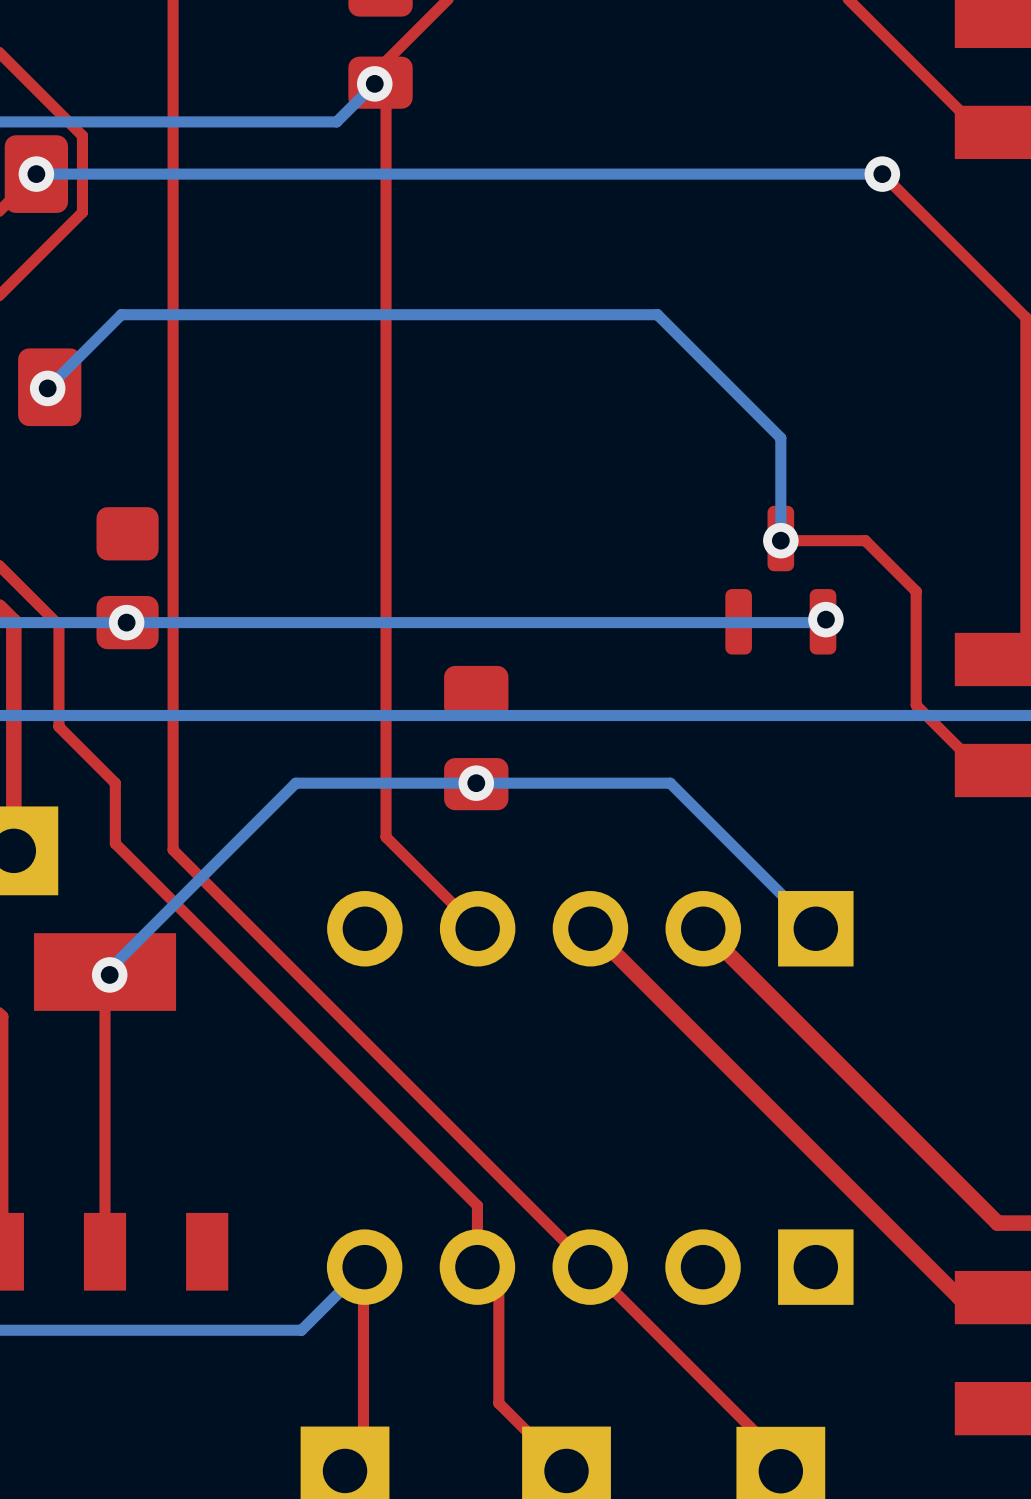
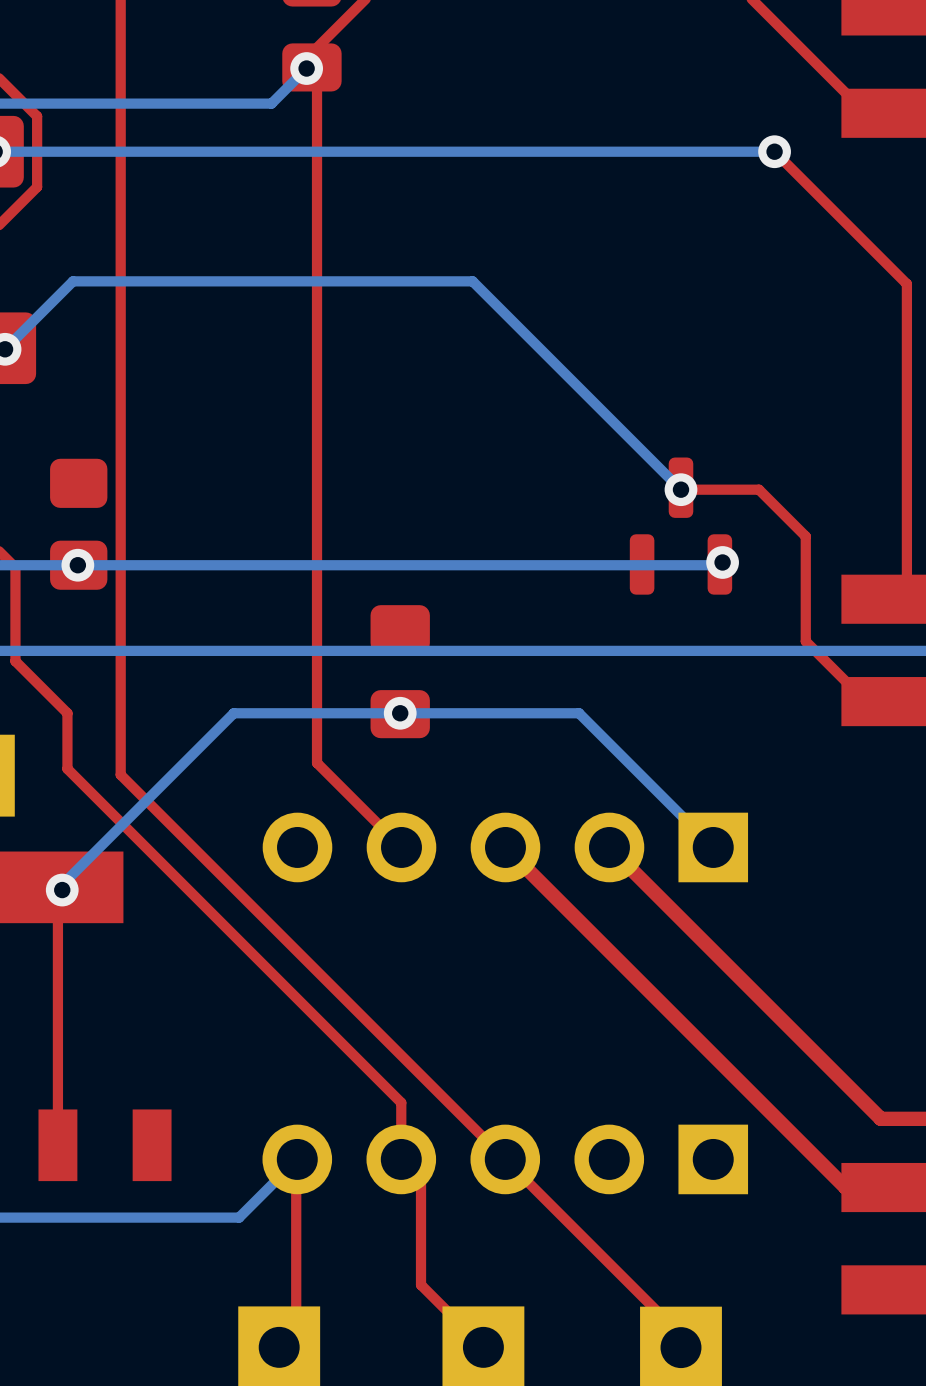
bottom track: (554, 314) (657, 314) (780, 438) (780, 540) -> (472, 281) (680, 489)

